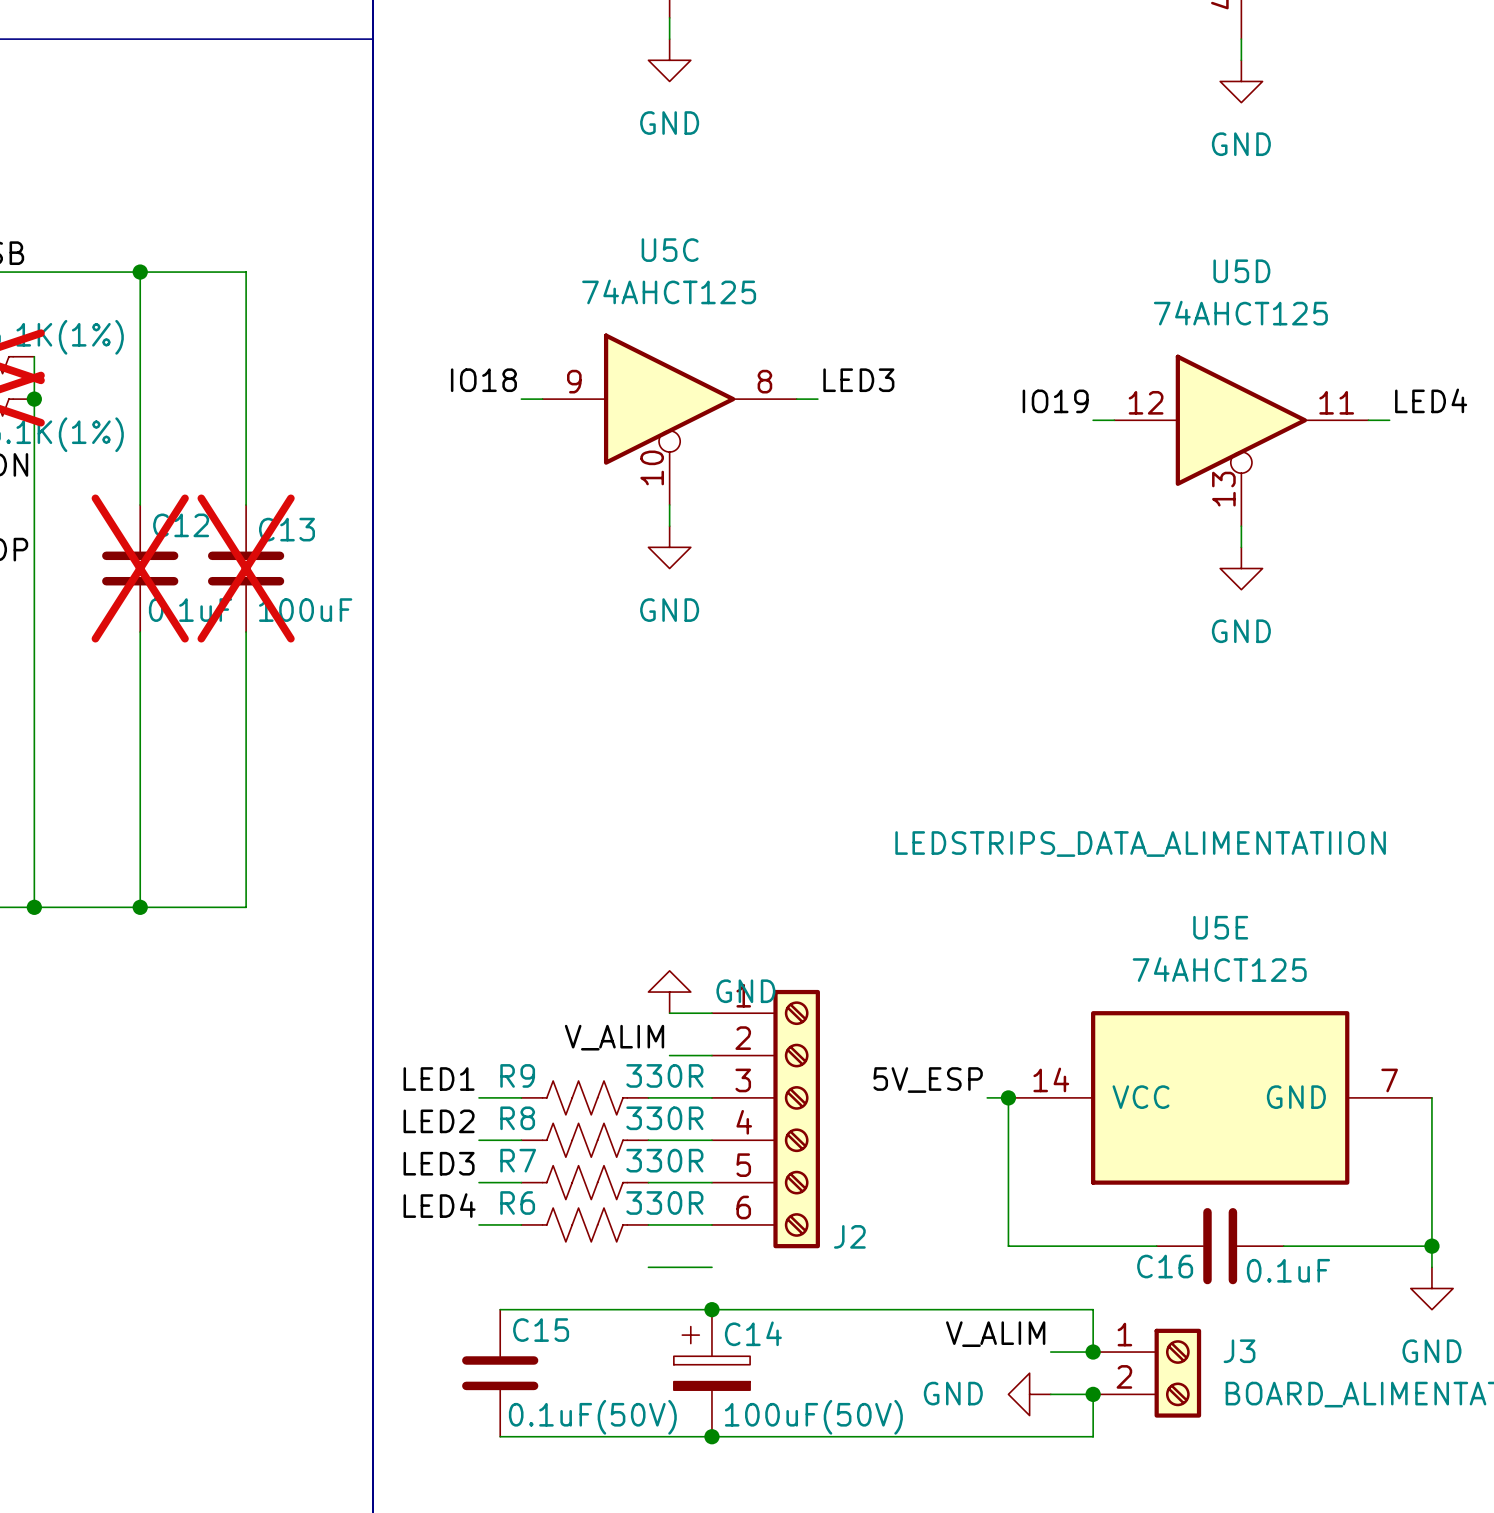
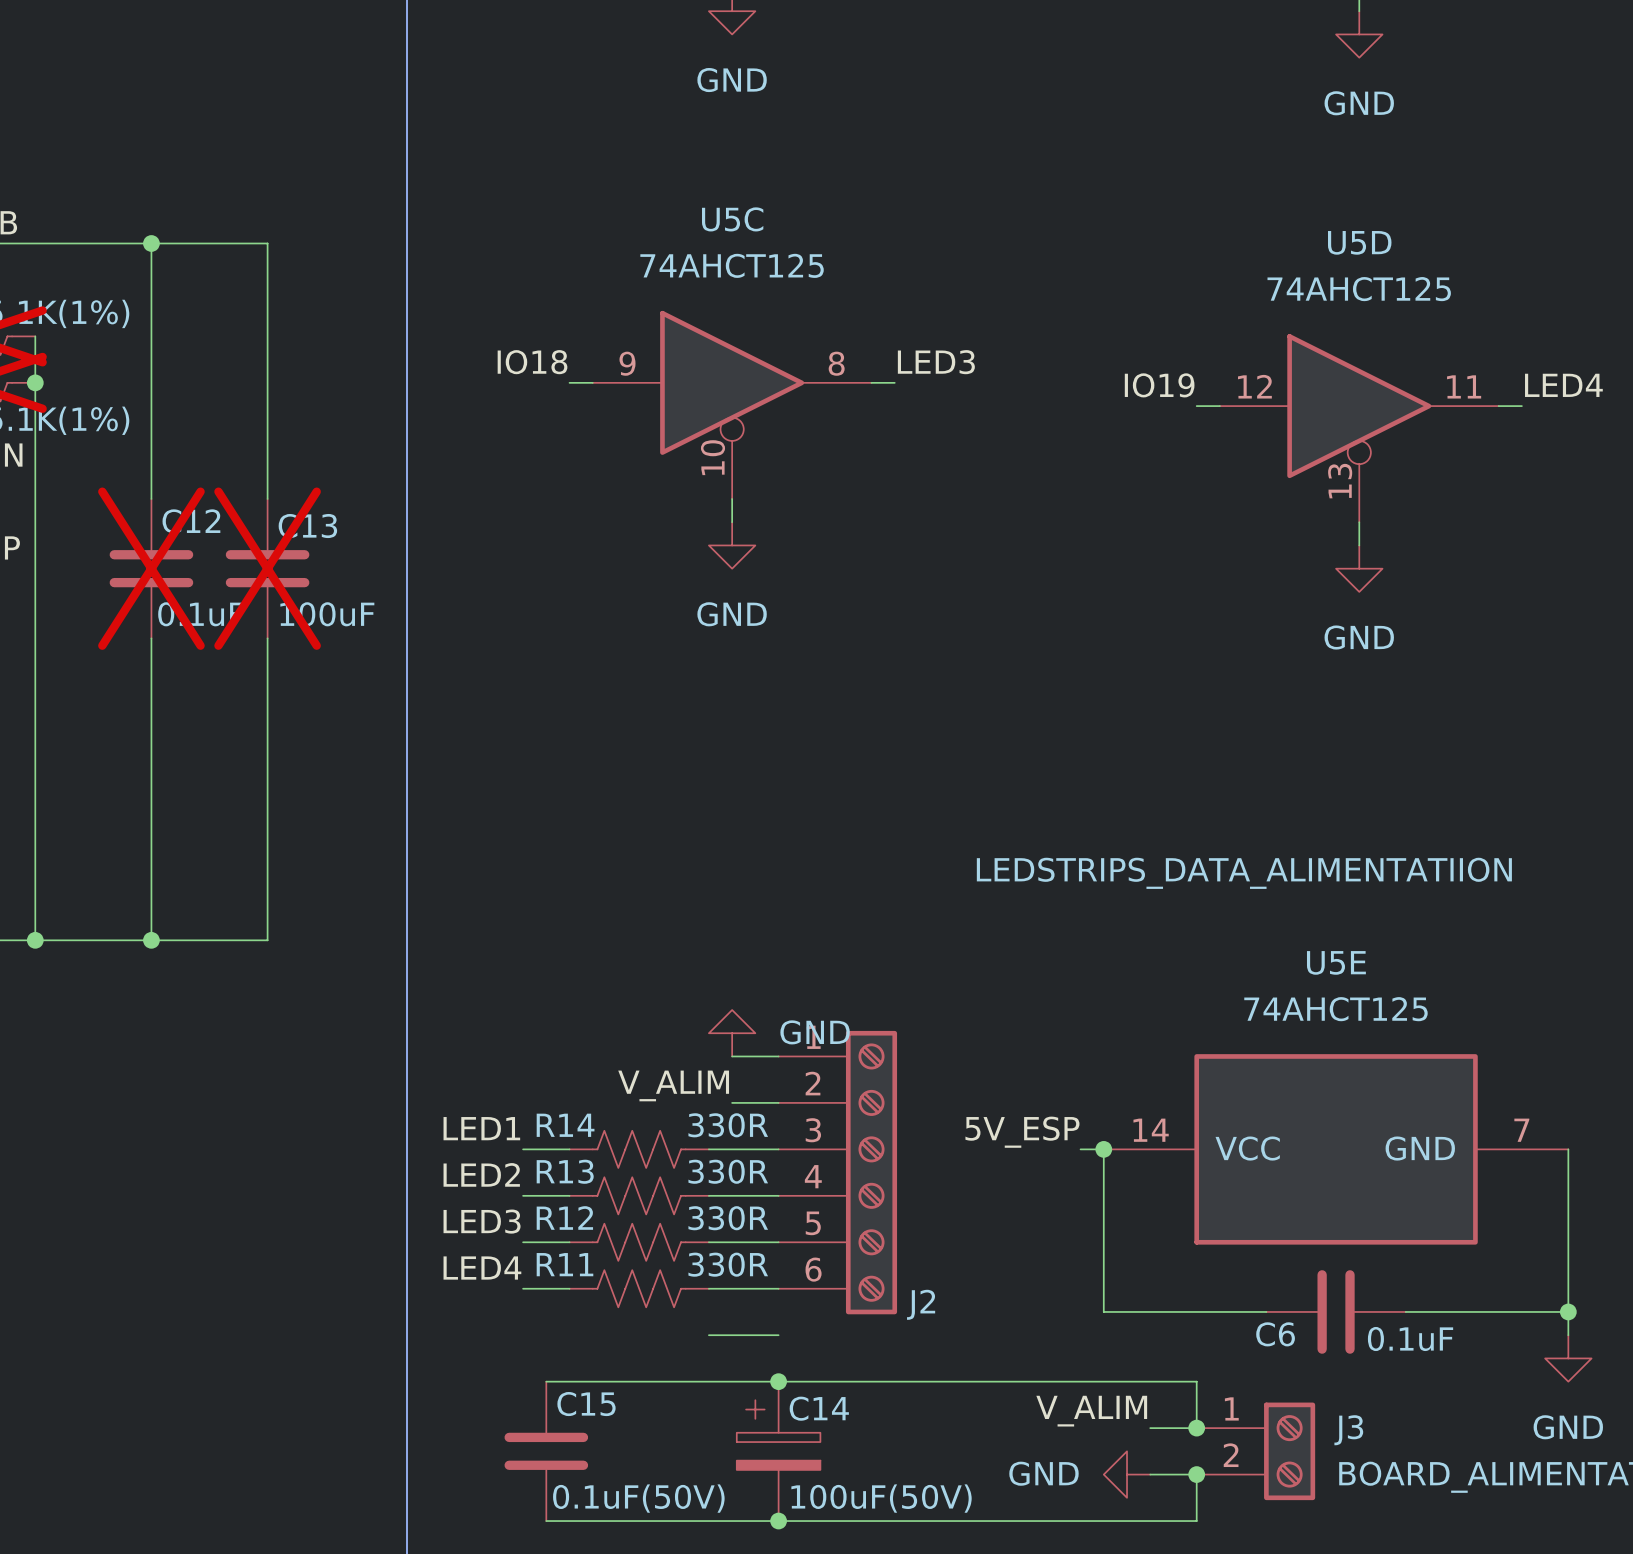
R9 name: R9 (517, 1075) -> R14 (565, 1125)
R8 name: R8 (517, 1118) -> R13 (565, 1171)
R7 name: R7 (518, 1160) -> R12 (564, 1217)
R6 name: R6 (517, 1203) -> R11 (564, 1264)
C16 name: C16 (1165, 1266) -> C6 (1275, 1334)

